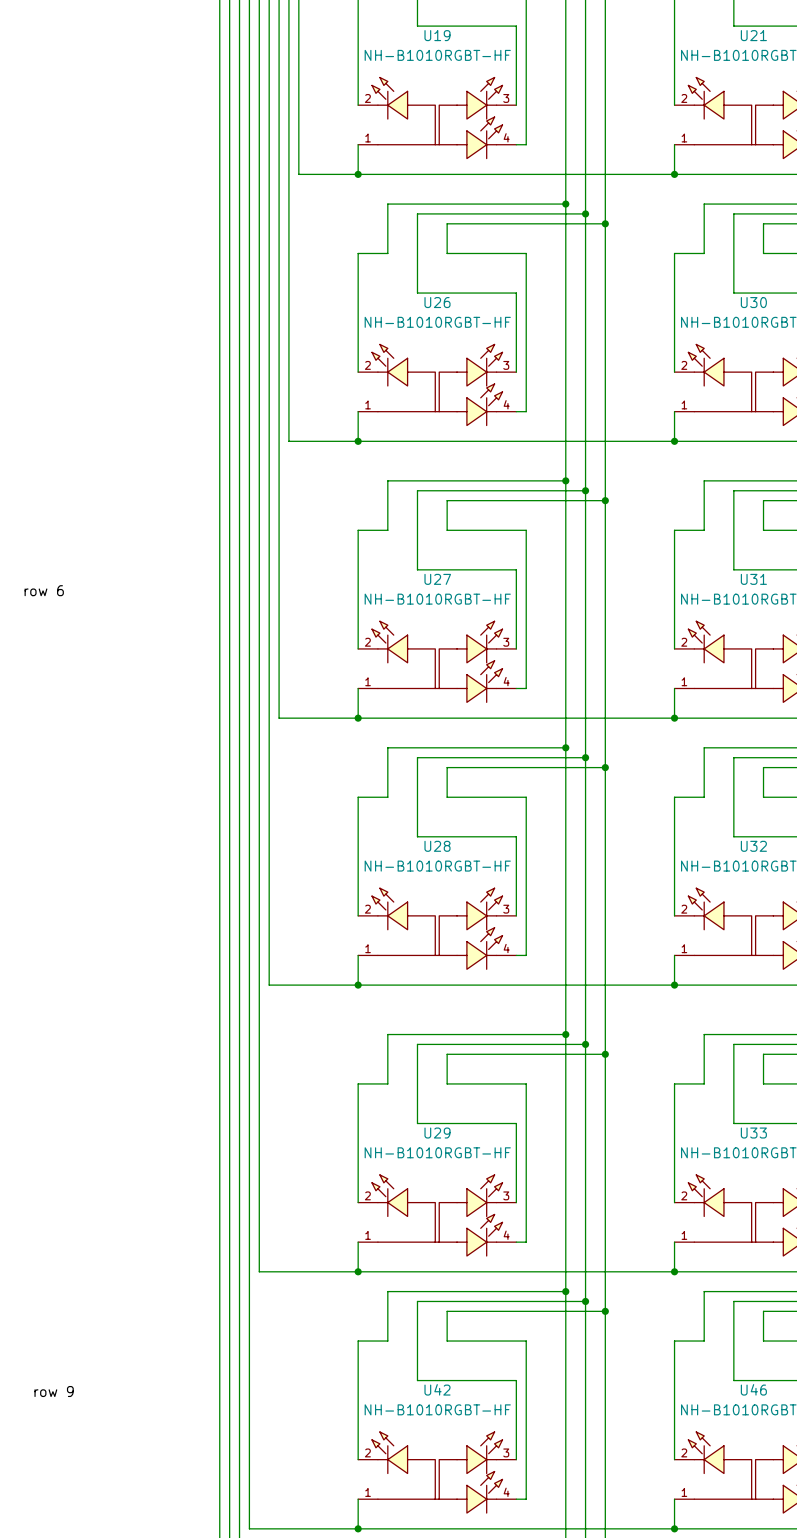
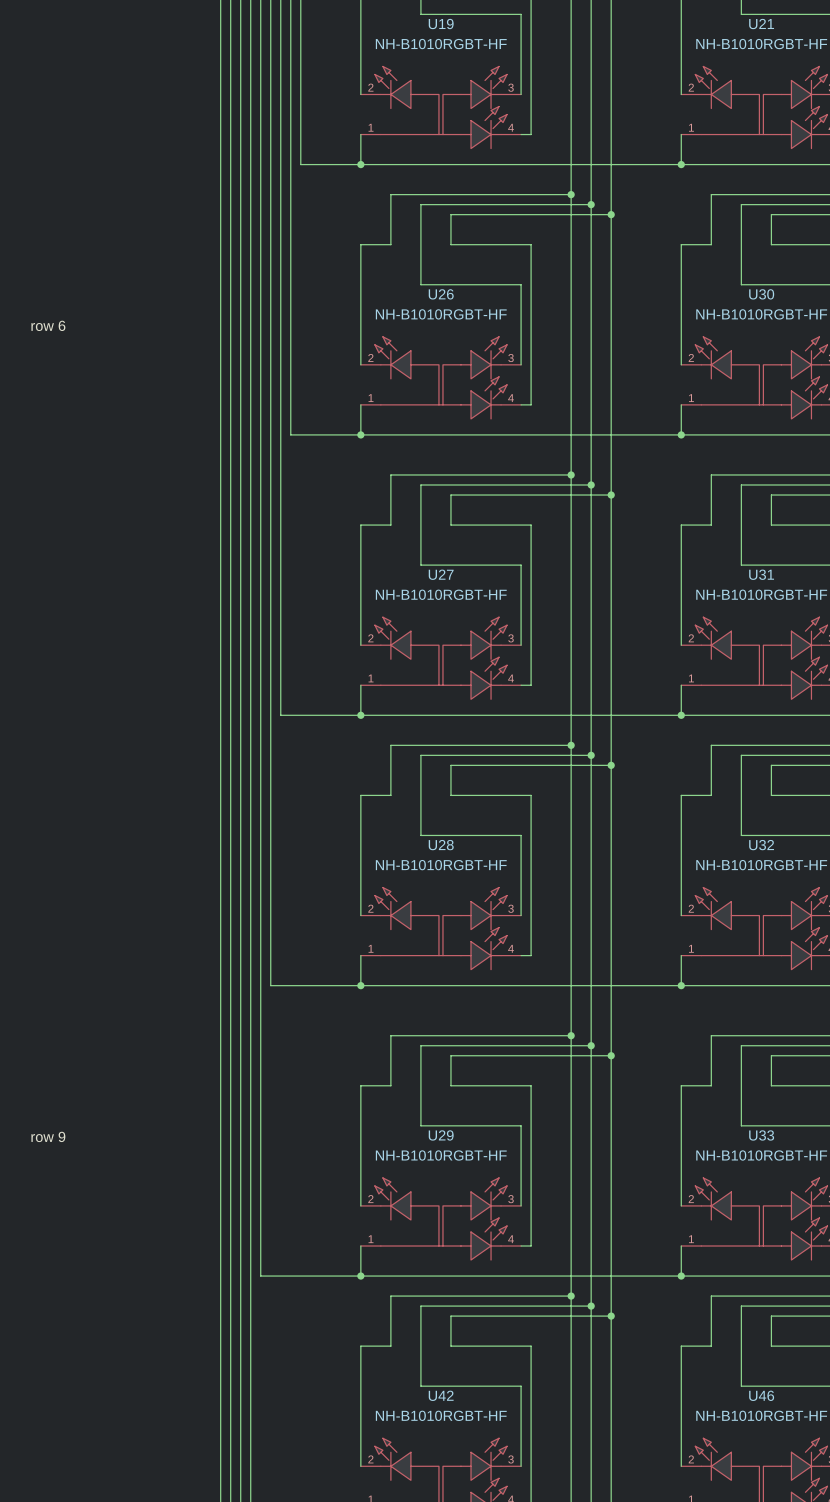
label: none -> row 6 (48, 325)
label: row 6 (44, 590) -> none
label: none -> row 9 (48, 1136)
label: row 9 (54, 1391) -> none

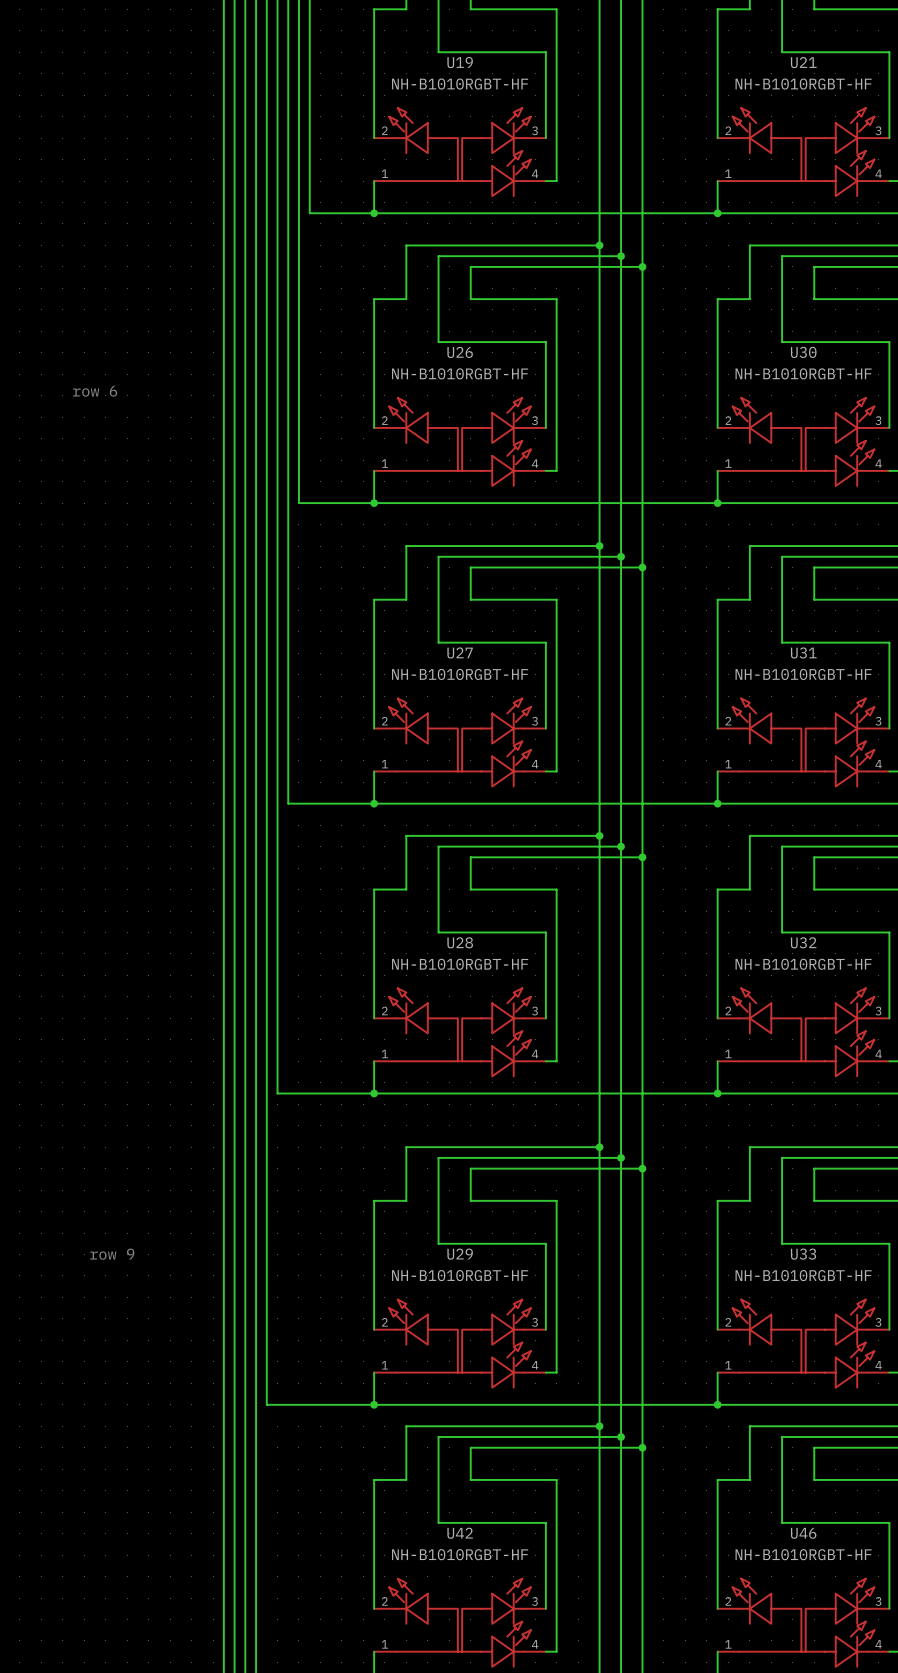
label: row 6 (48, 325) -> none
text: none -> row 6 (95, 391)
text: none -> row 9 (112, 1254)
label: row 9 (48, 1136) -> none

